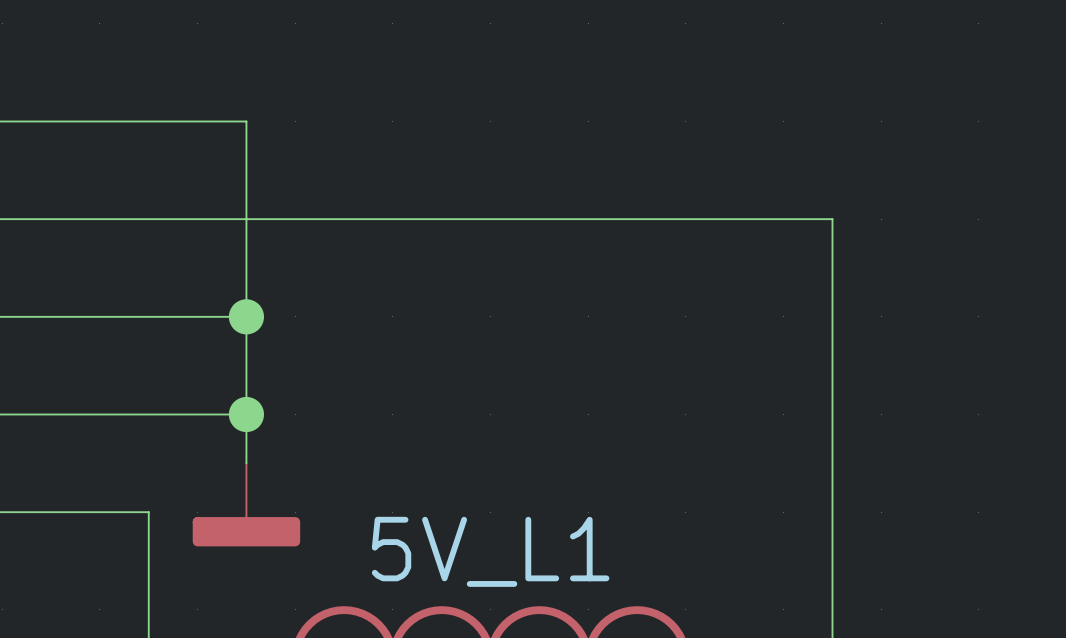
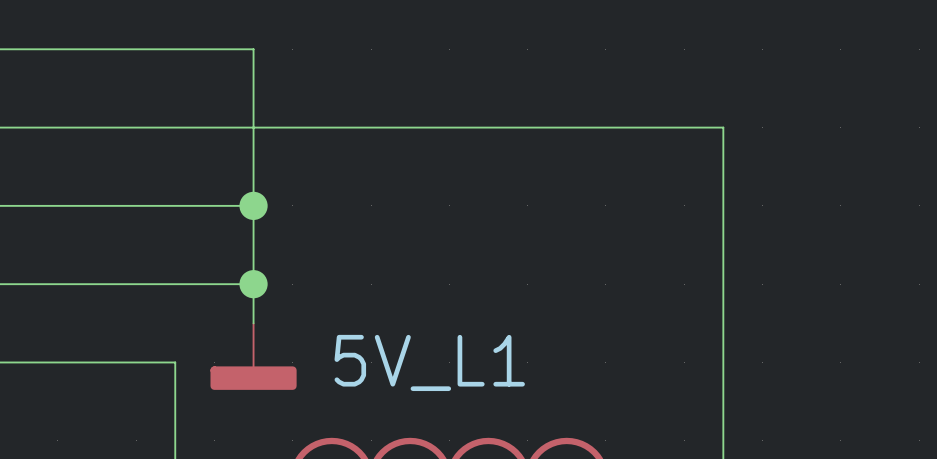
5V_L1 name position: 5V_L1 (490, 551) -> 5V_L1 (429, 362)

